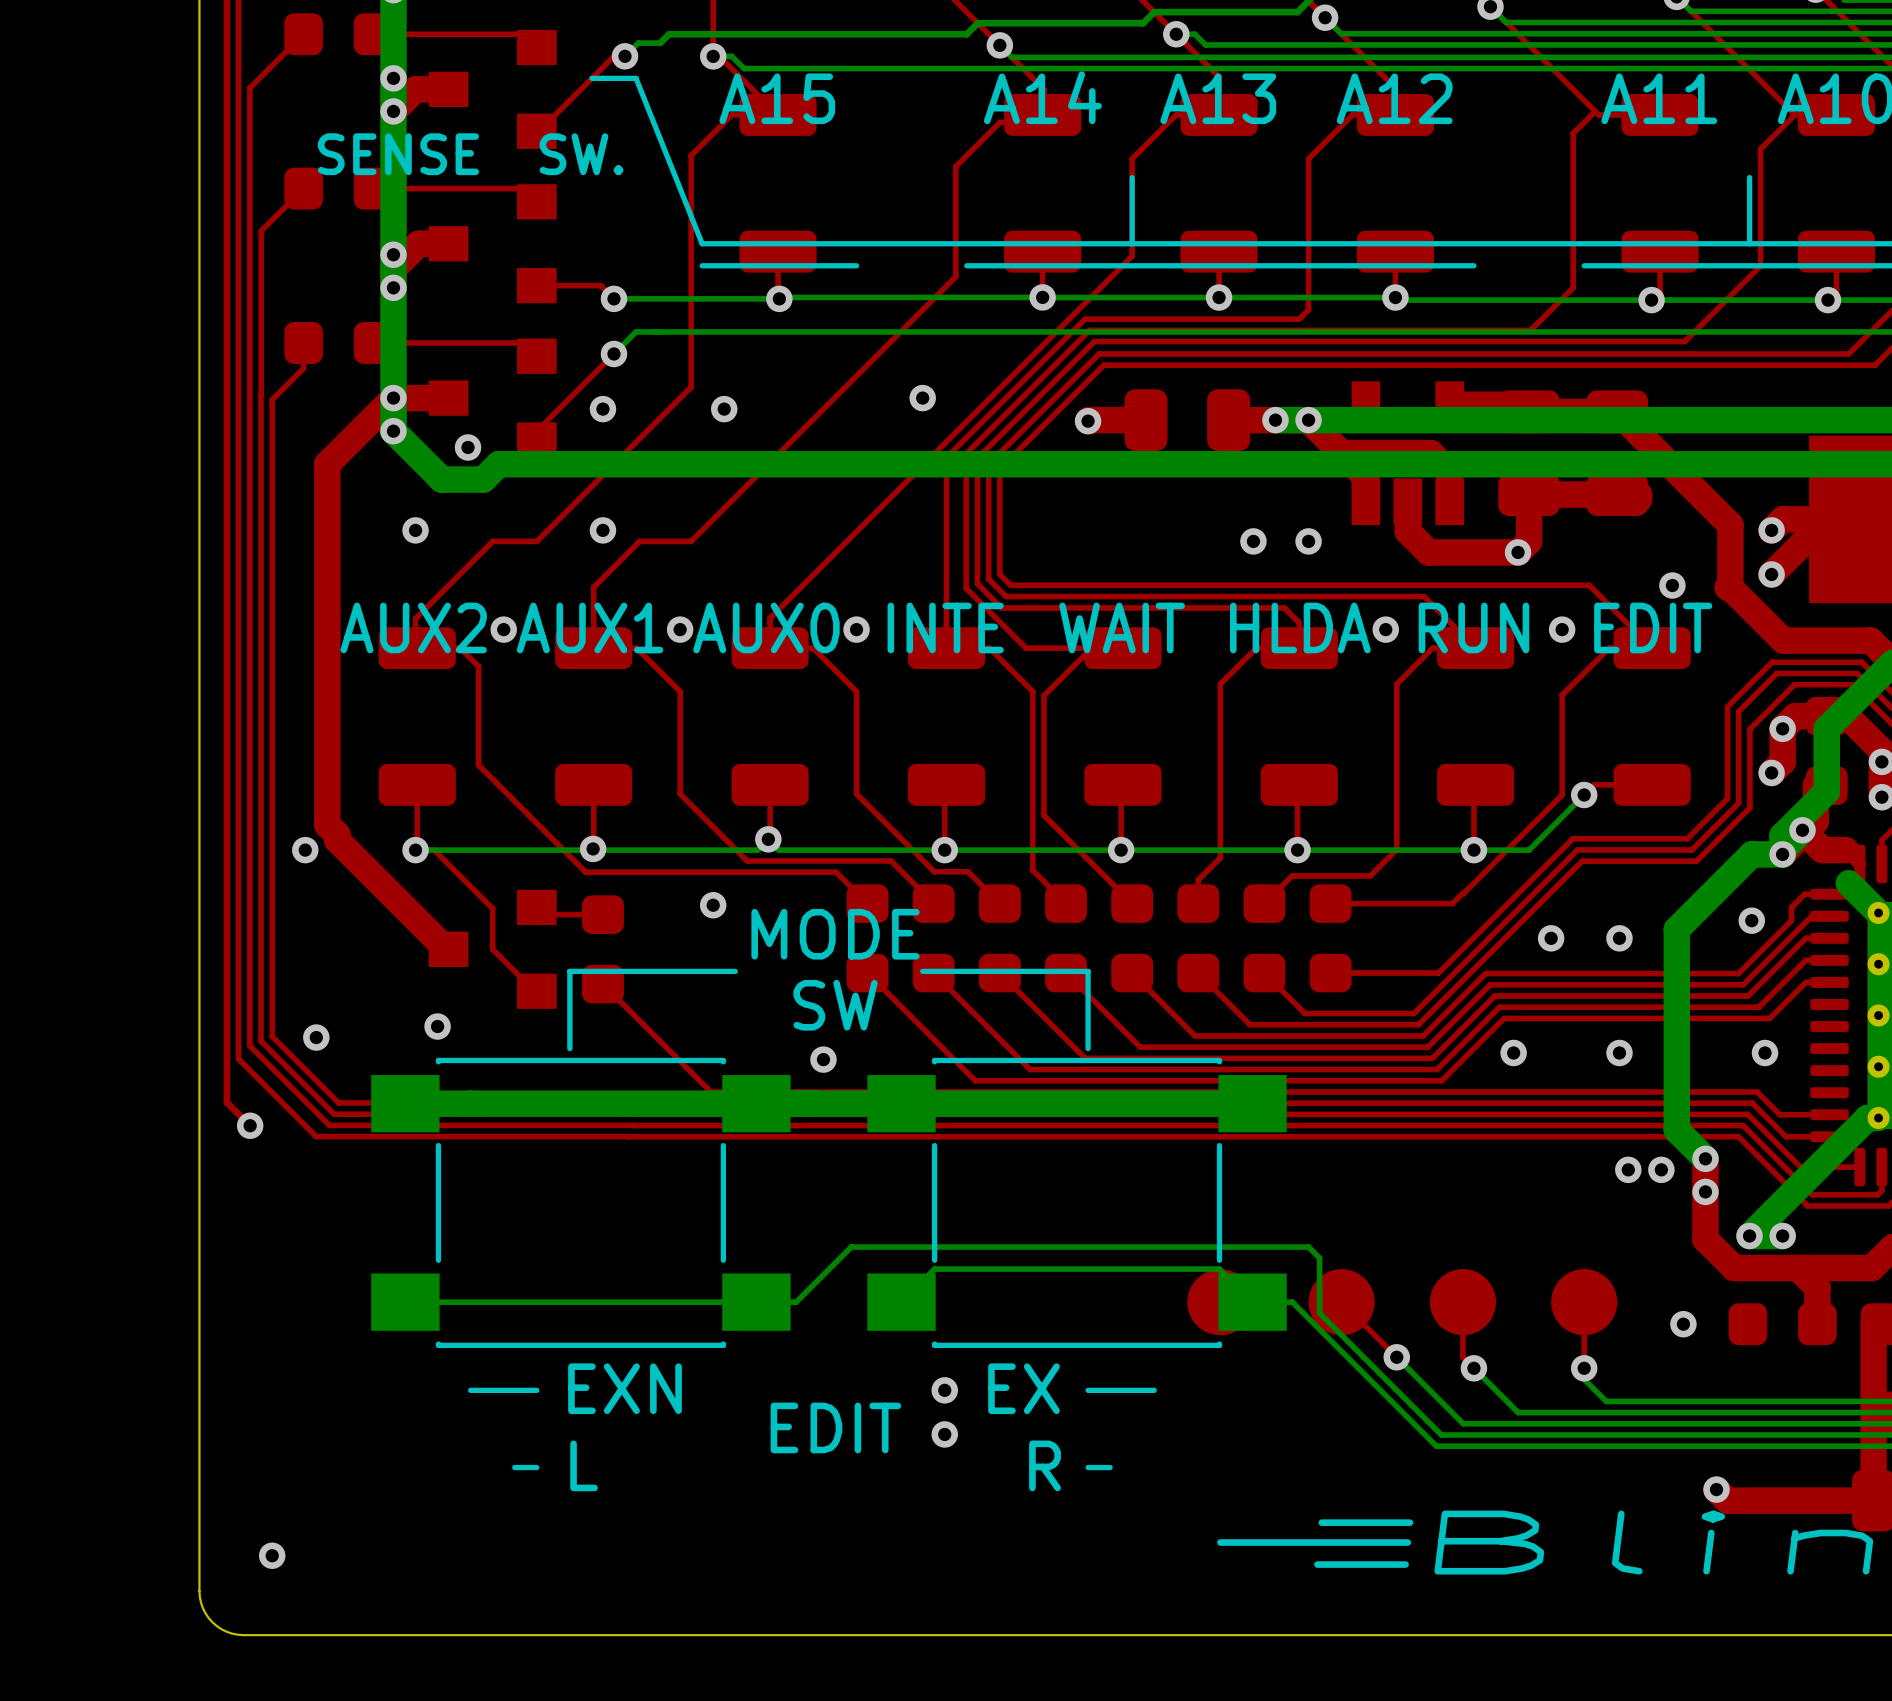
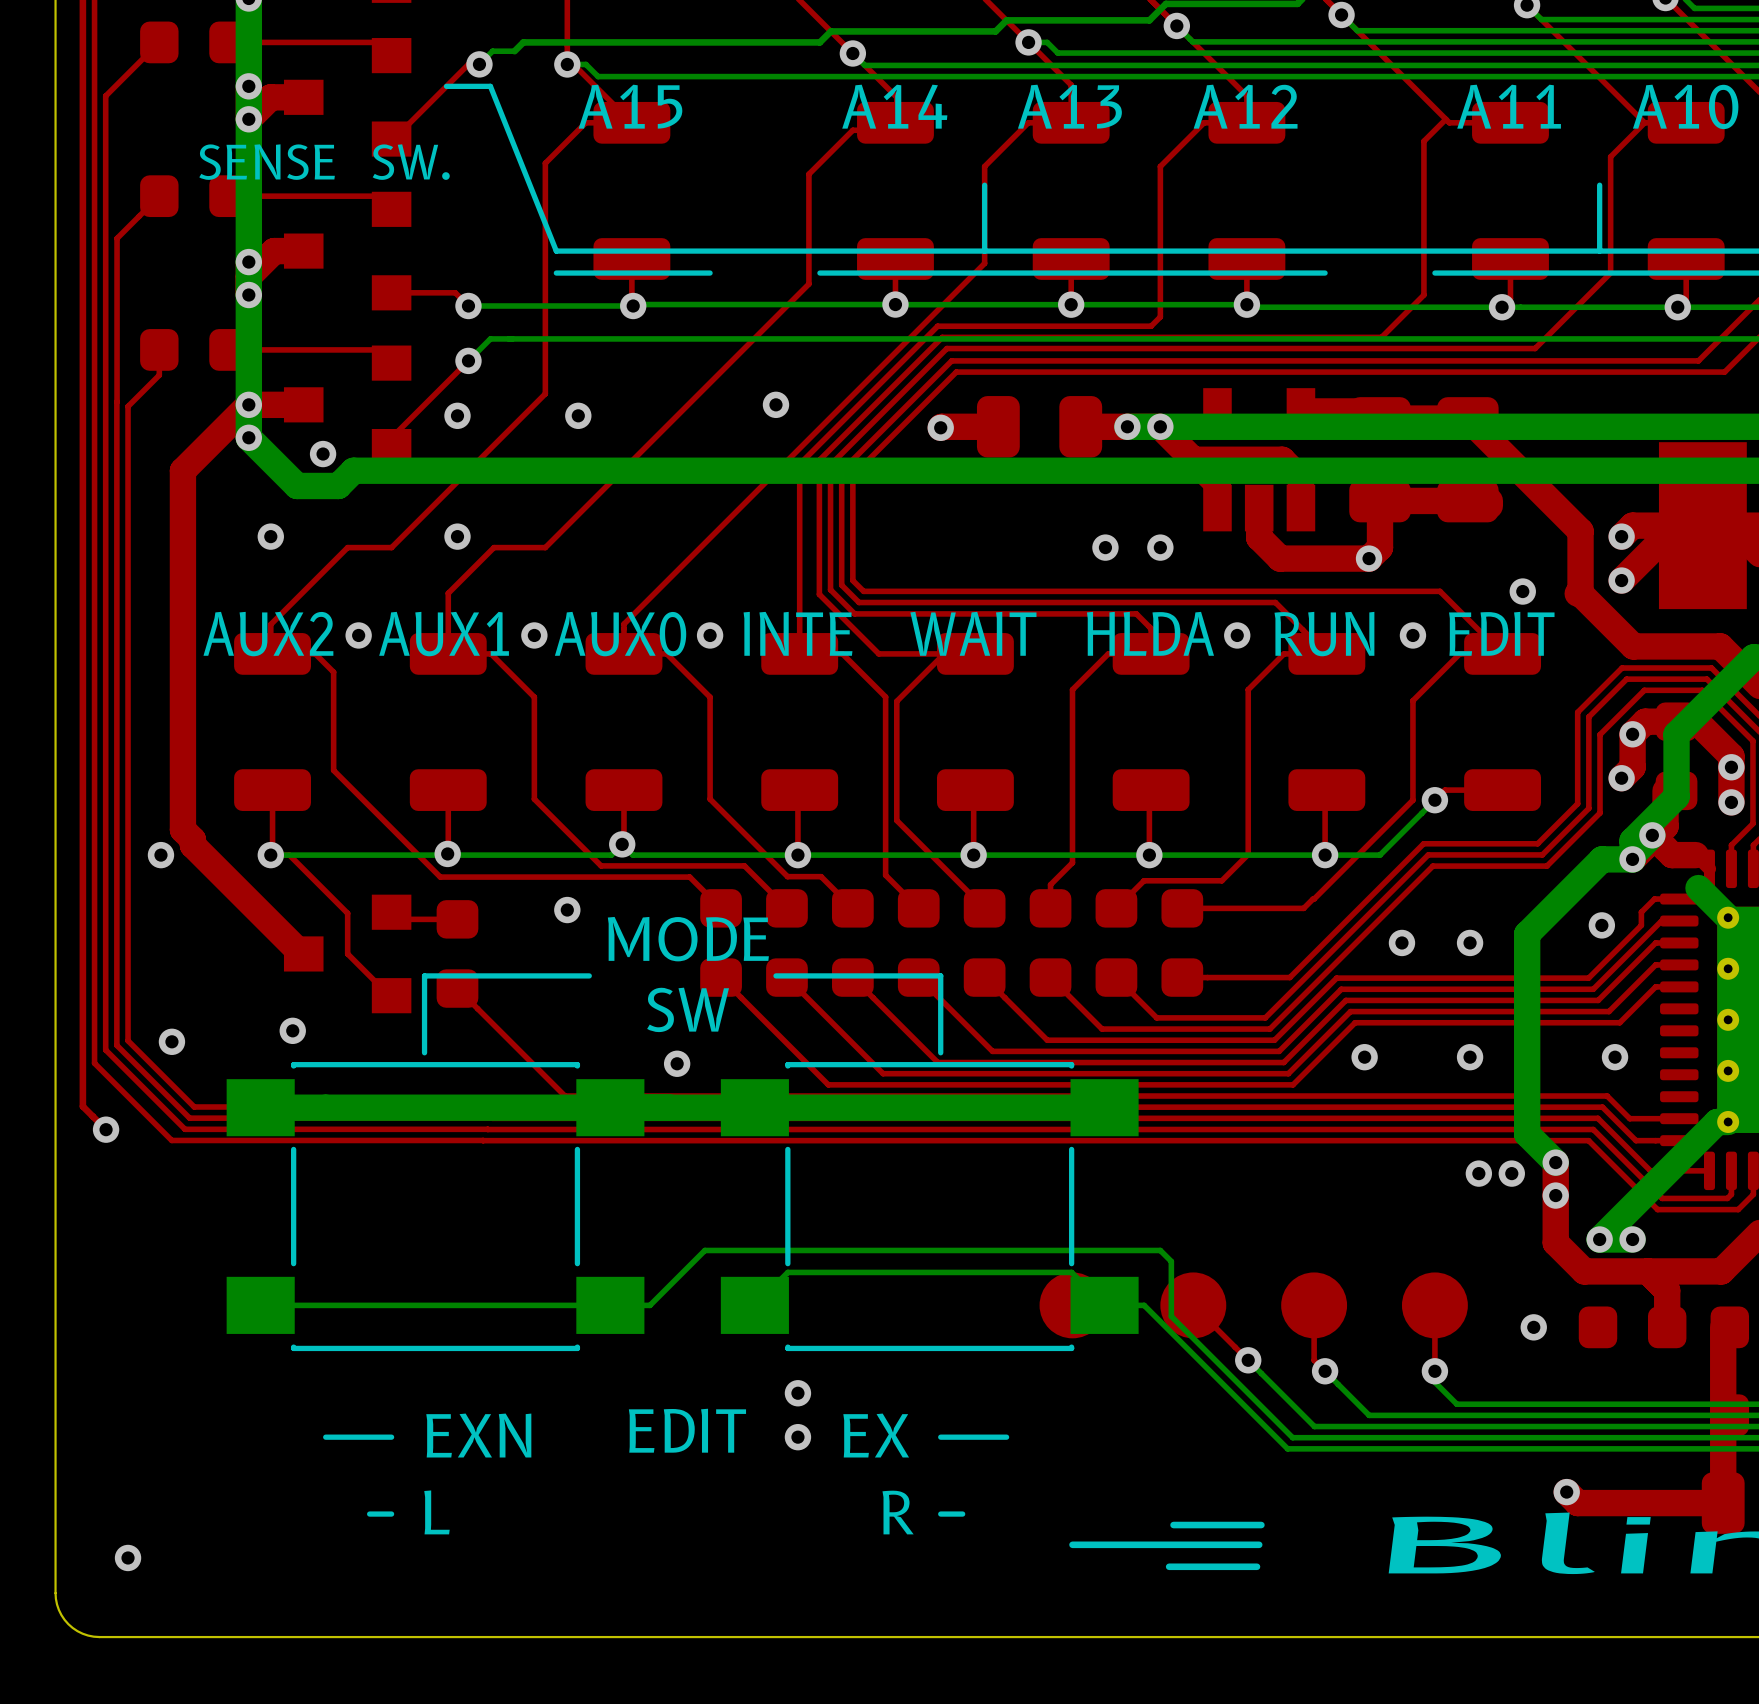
text position: EXN (625, 1388) -> EXN (478, 1435)
text position: EX (1024, 1388) -> EX (876, 1435)
line: (536, 1390) (470, 1390) -> (391, 1437) (325, 1437)
line: (1154, 1390) (1088, 1390) -> (1006, 1437) (940, 1437)
text position: L (584, 1465) -> L (436, 1512)
text position: R (1045, 1465) -> R (898, 1512)
line: (536, 1467) (514, 1467) -> (391, 1514) (369, 1514)
line: (1110, 1467) (1088, 1467) -> (962, 1514) (940, 1514)

